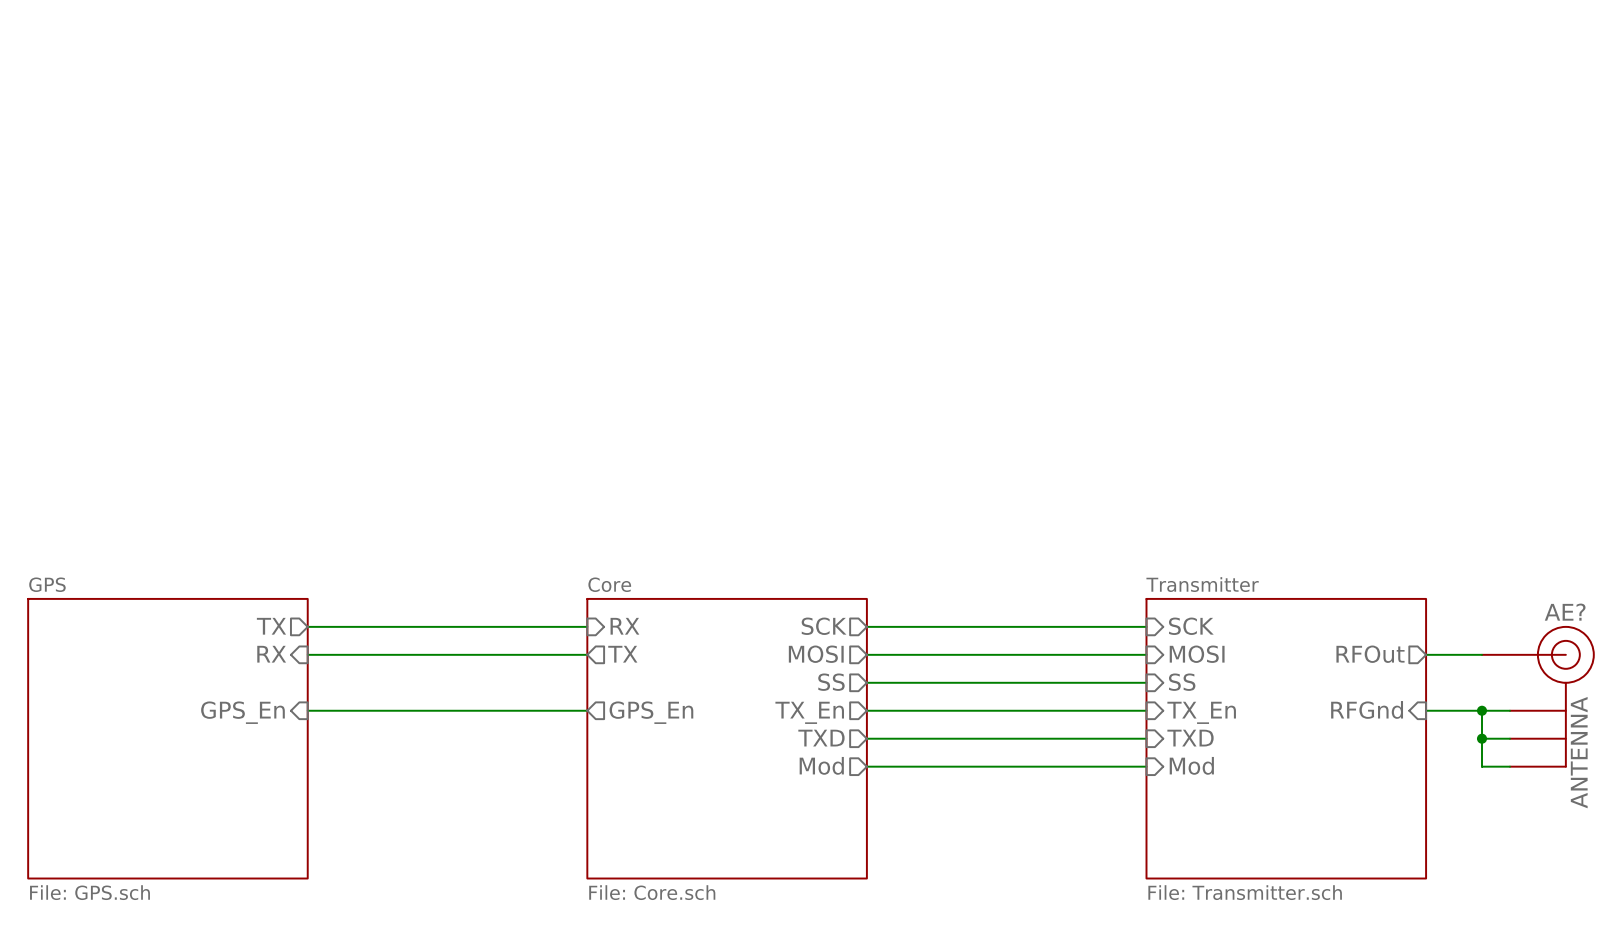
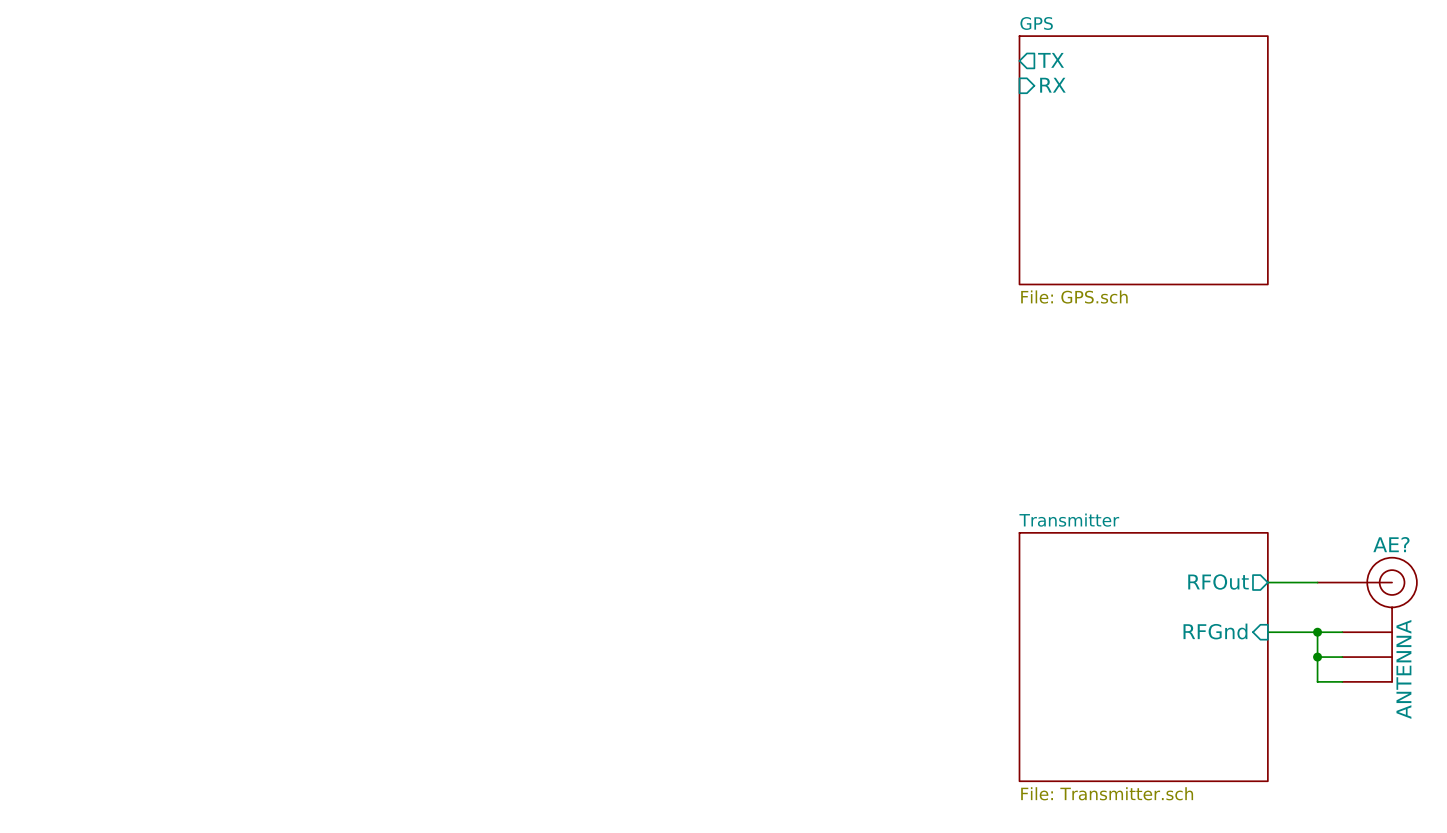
sheet pin: none -> TX (1051, 60)
sheet pin: none -> RX (1052, 85)
sheet GPS: none -> File: GPS.sch (1143, 160)
sheet pin: TX (271, 626) -> none
wire: (307, 626) (587, 626) -> none
sheet pin: RX (624, 626) -> none
sheet pin: SCK (824, 626) -> none
wire: (866, 626) (1146, 626) -> none
sheet pin: SCK (1191, 626) -> none
sheet pin: RX (271, 654) -> none
wire: (307, 654) (587, 654) -> none
sheet pin: TX (622, 654) -> none
sheet pin: MOSI (816, 654) -> none
wire: (866, 654) (1146, 654) -> none
sheet pin: MOSI (1197, 654) -> none
sheet pin: SS (831, 682) -> none
wire: (866, 682) (1146, 682) -> none
sheet pin: SS (1182, 682) -> none
wire: (307, 710) (587, 710) -> none
wire: (866, 710) (1146, 710) -> none
sheet pin: GPS_En (242, 712) -> none
sheet pin: GPS_En (651, 712) -> none
sheet pin: TX_En (809, 712) -> none
sheet pin: TX_En (1201, 712) -> none
sheet GPS: File: GPS.sch (167, 738) -> none
sheet Core: File: Core.sch (727, 738) -> none
sheet pin: TXD (821, 738) -> none
wire: (866, 738) (1146, 738) -> none
sheet pin: TXD (1190, 738) -> none
sheet pin: Mod (821, 765) -> none
sheet pin: Mod (1191, 765) -> none
wire: (866, 766) (1146, 766) -> none

